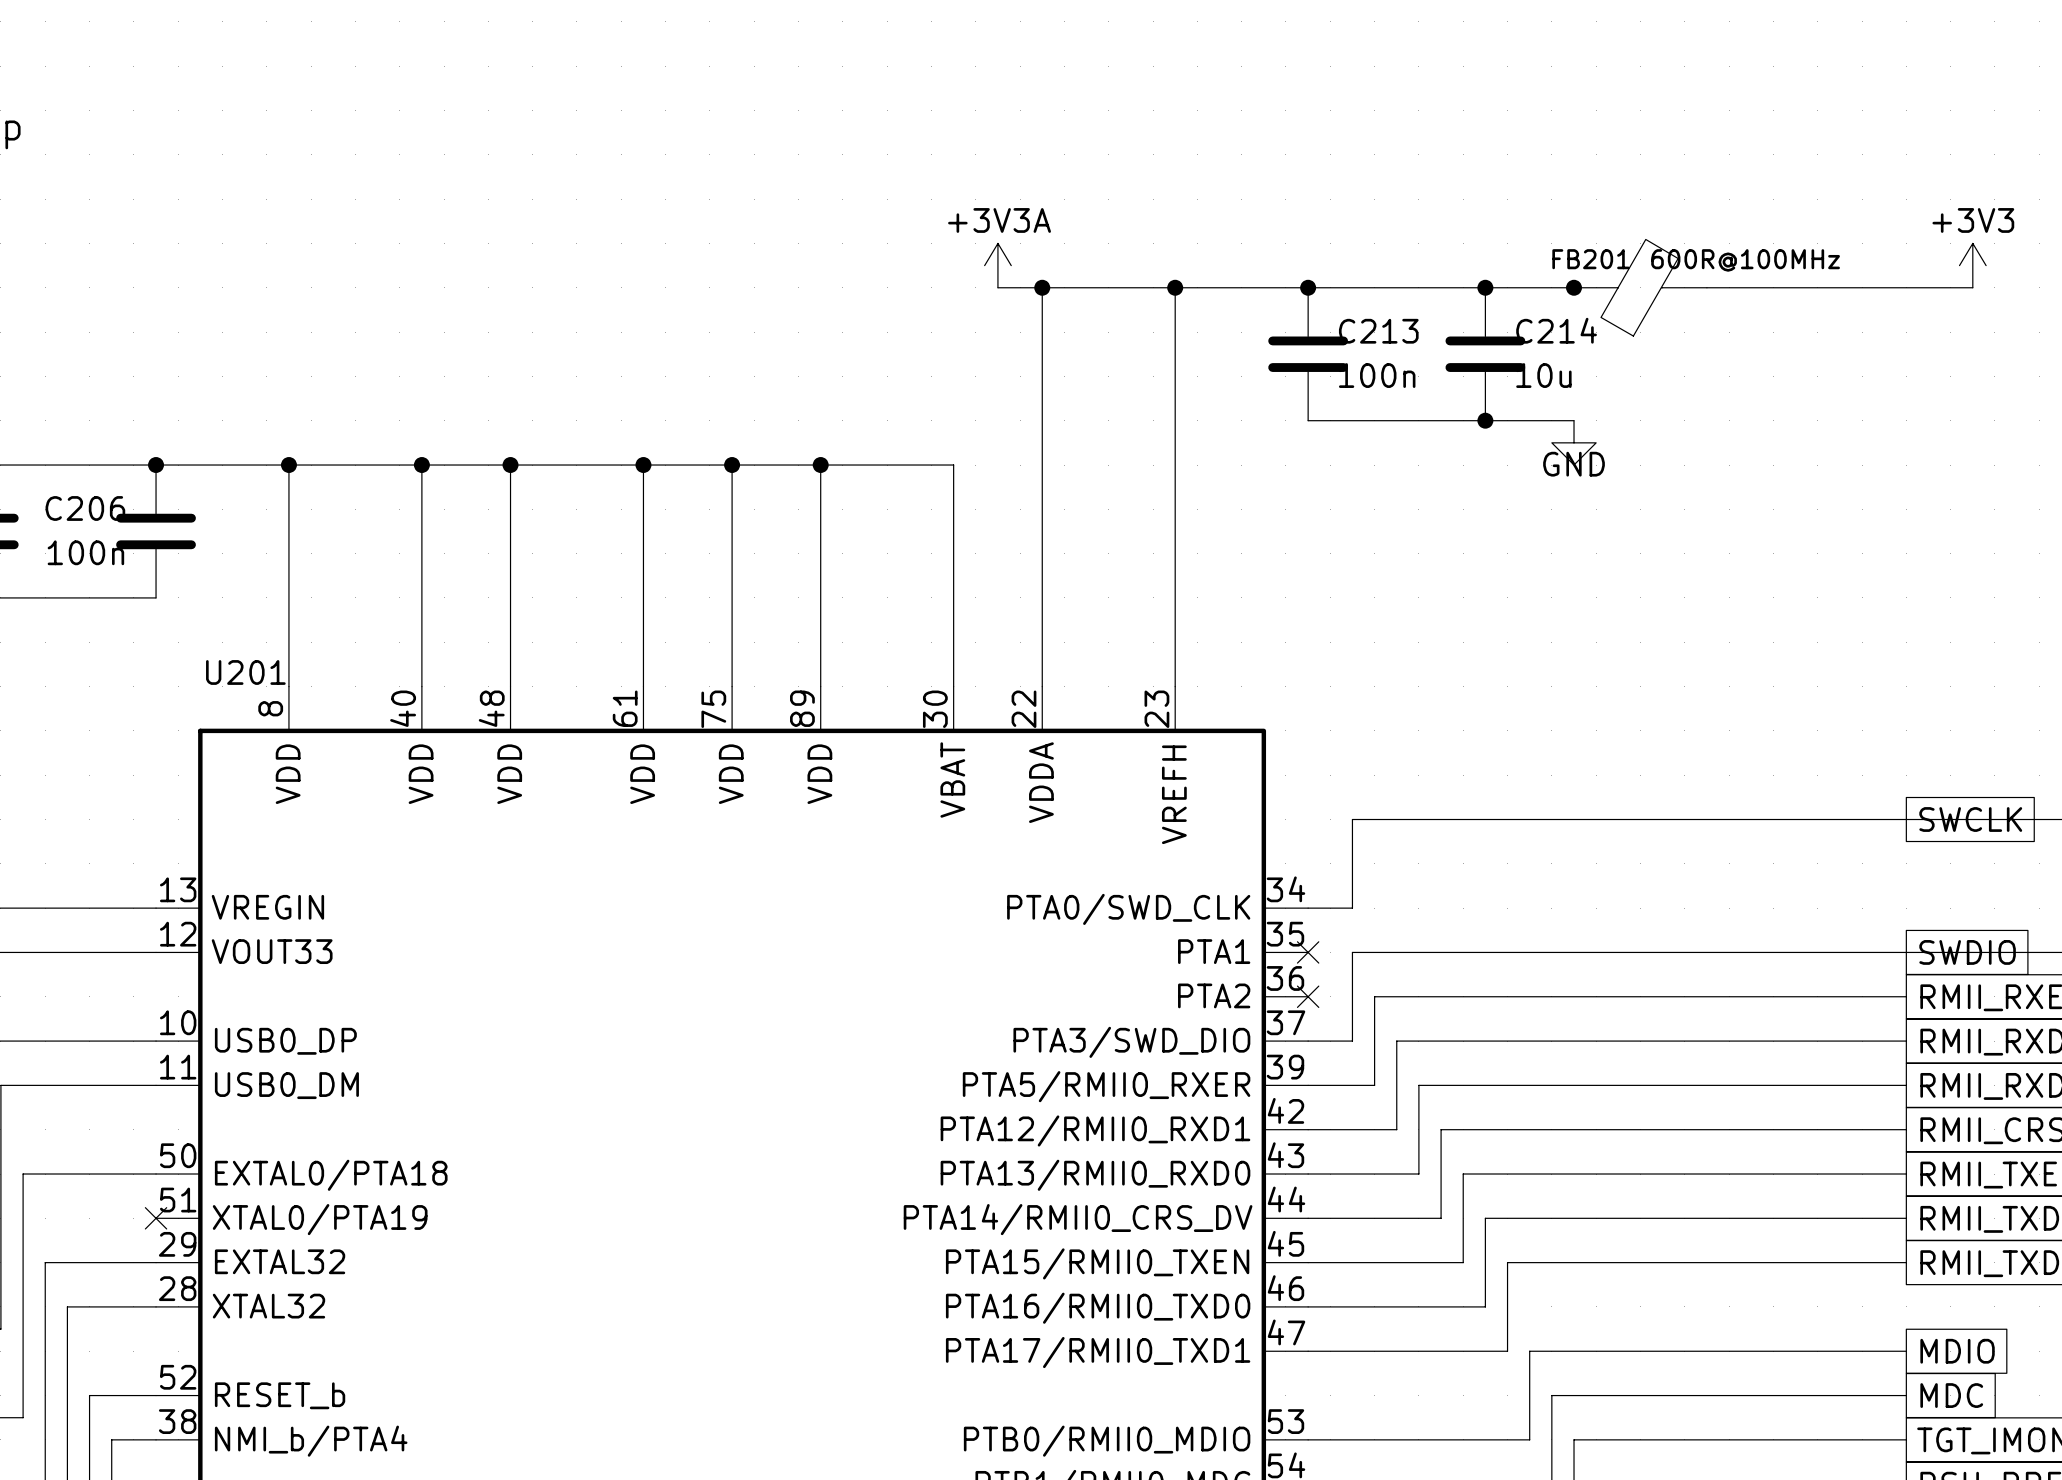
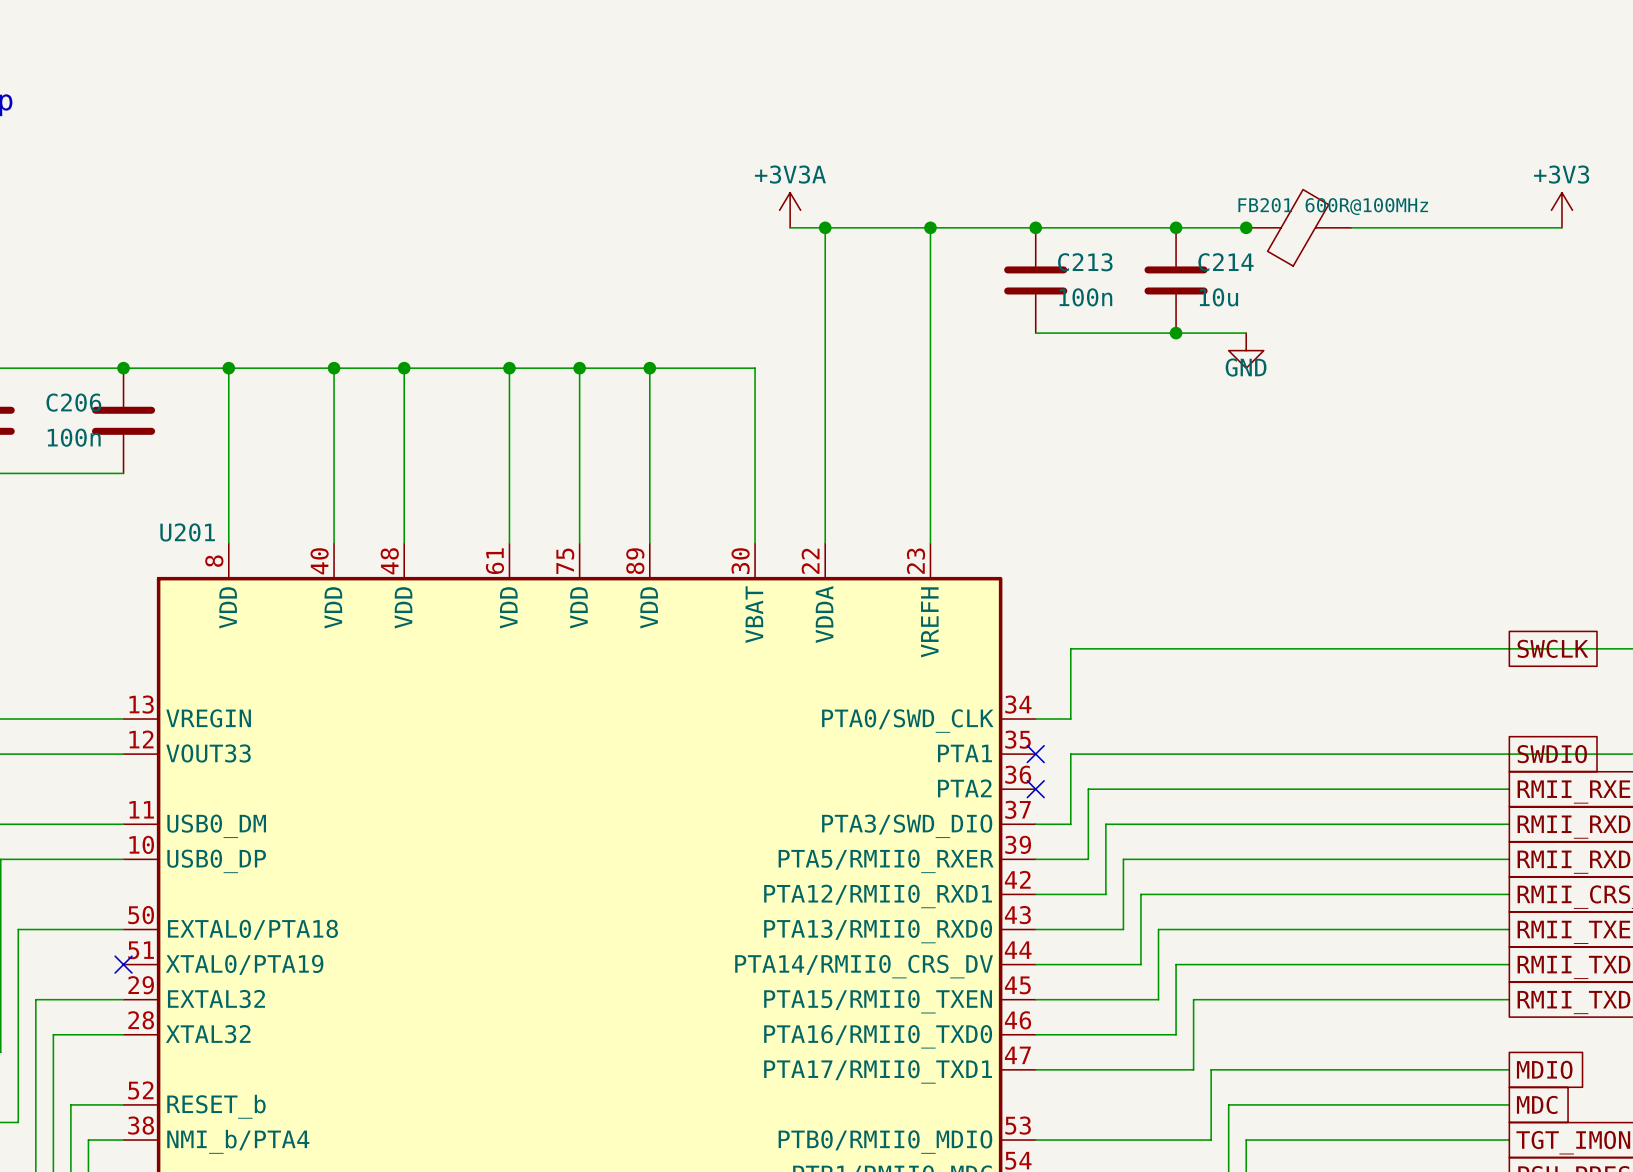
U201 pin number: 10 (178, 1022) -> 11 (141, 809)
U201 pin name: USB0_DP (285, 1041) -> USB0_DM (216, 826)
U201 pin number: 11 (178, 1067) -> 10 (141, 844)
U201 pin name: USB0_DM (286, 1085) -> USB0_DP (216, 861)

